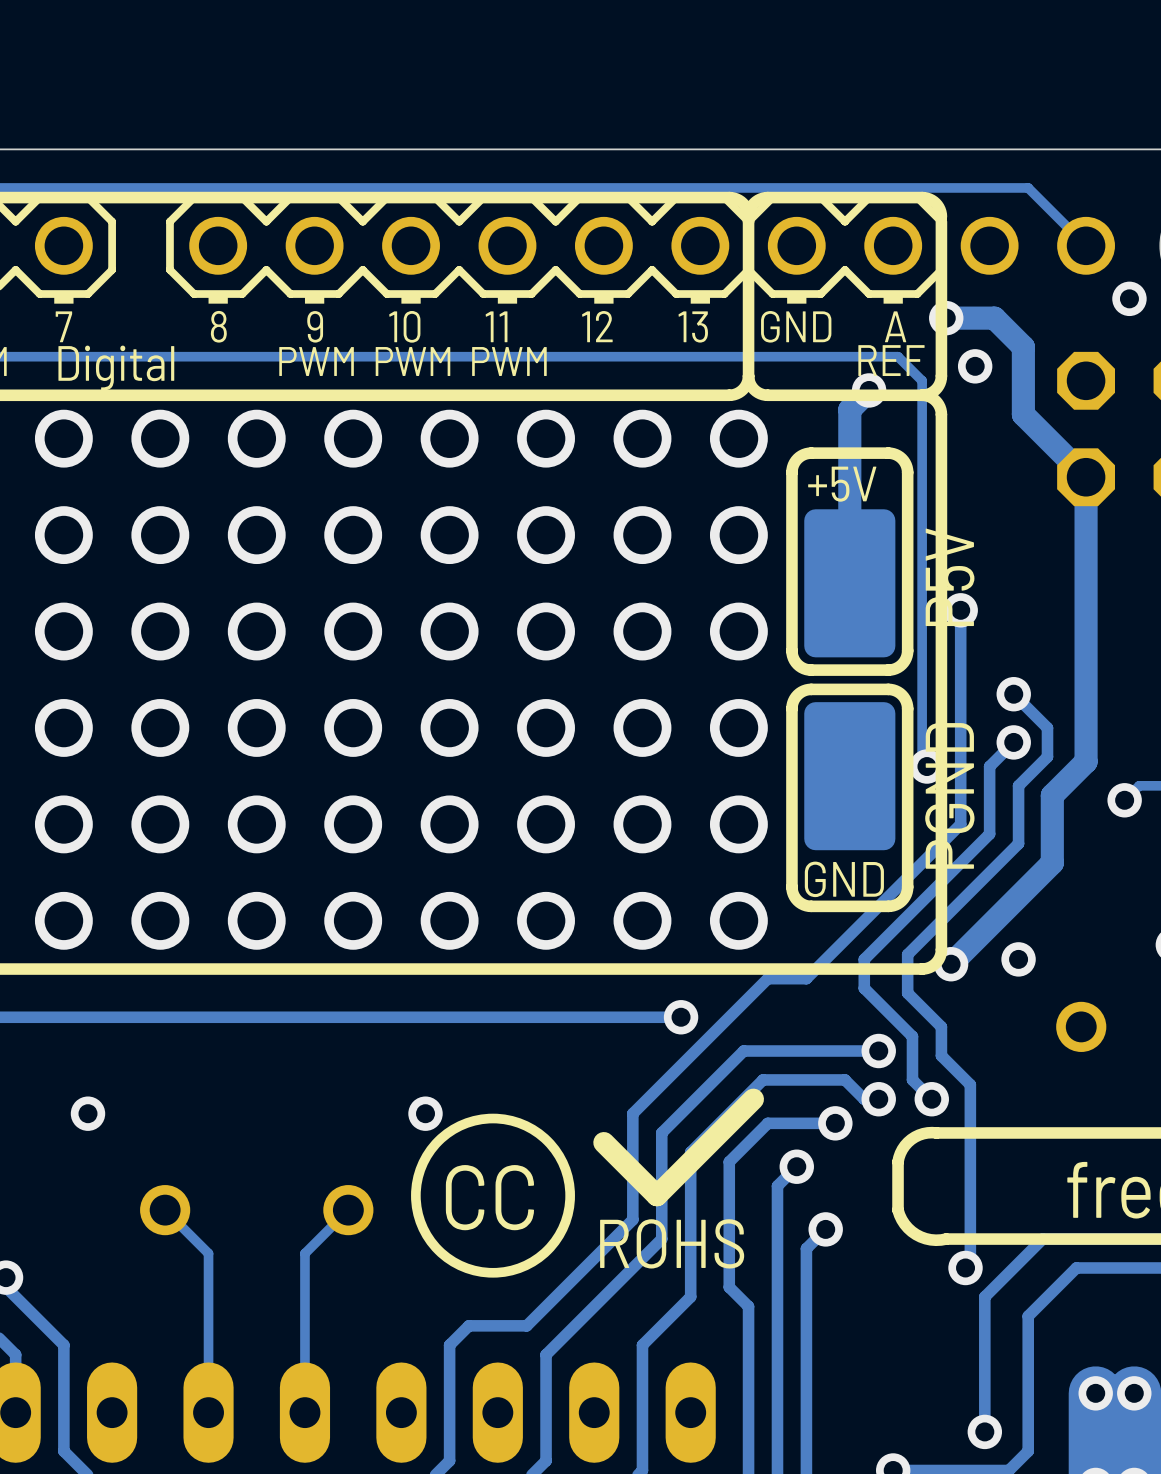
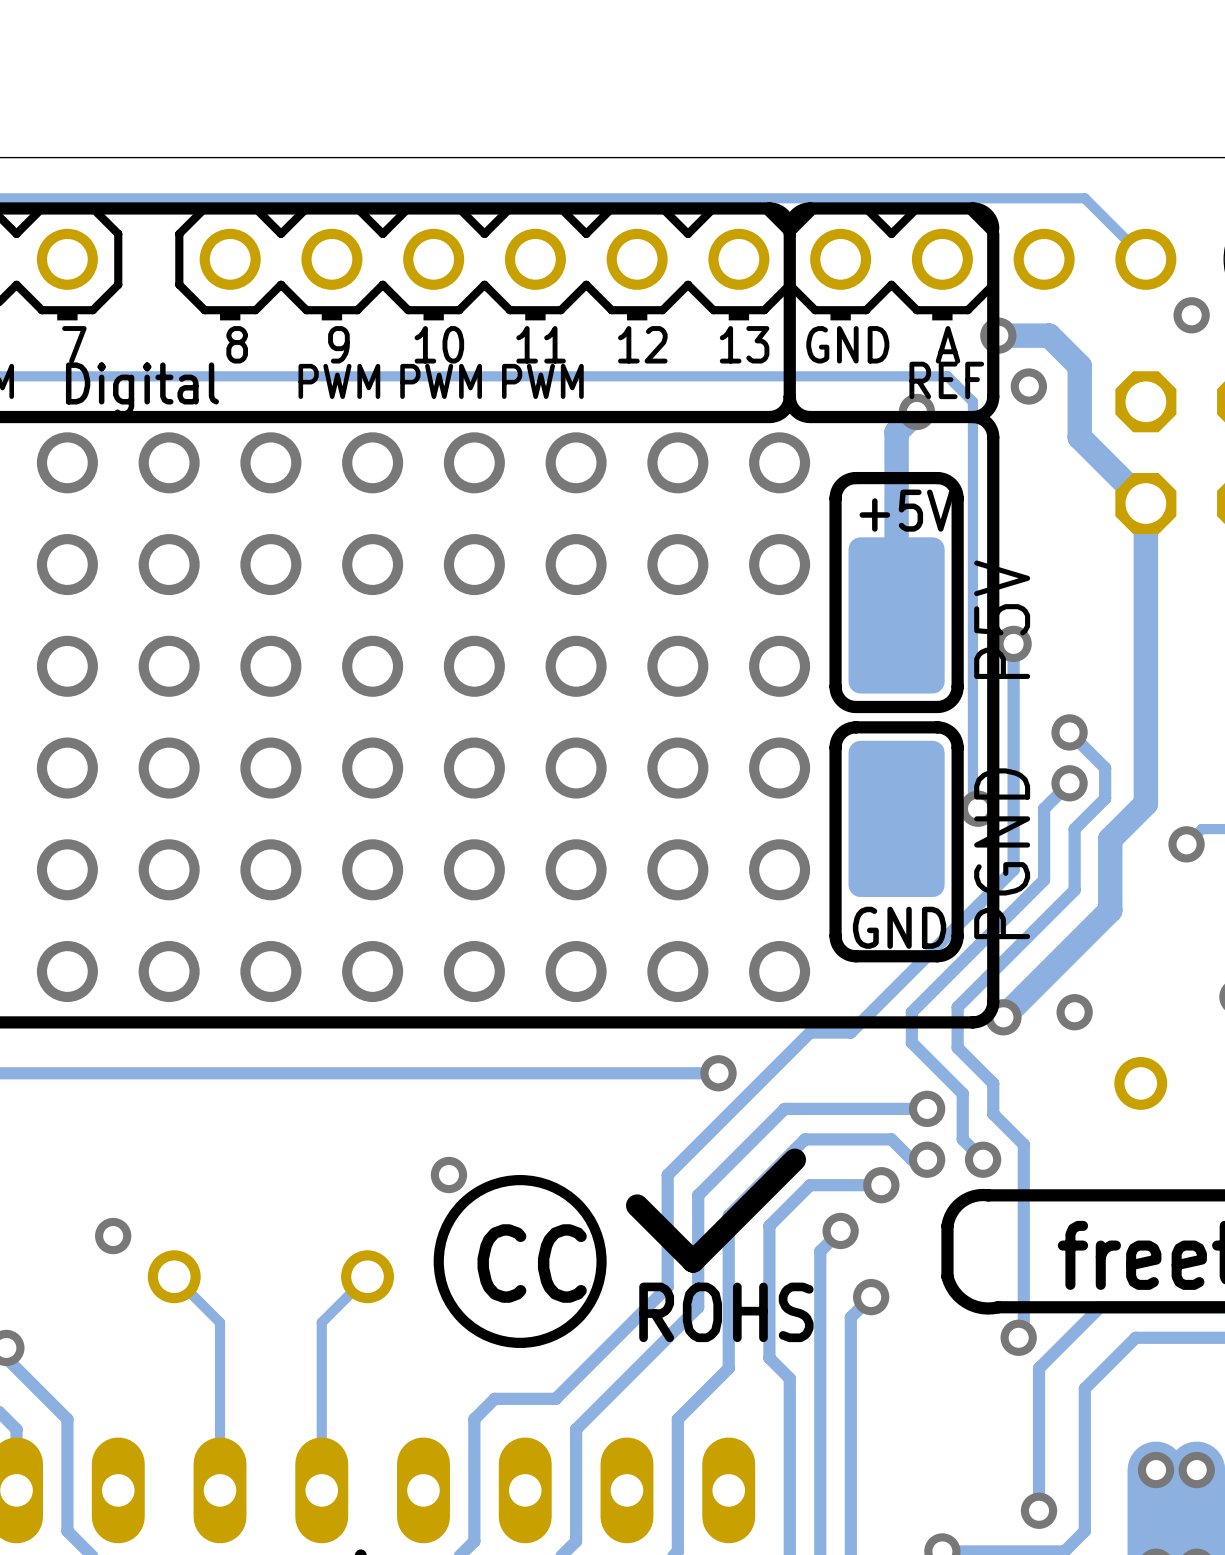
via position: (87, 1113) -> (113, 1236)

